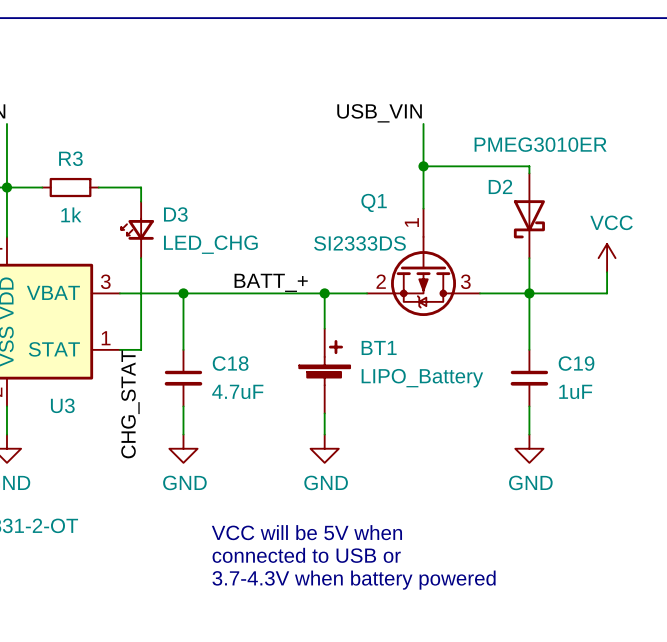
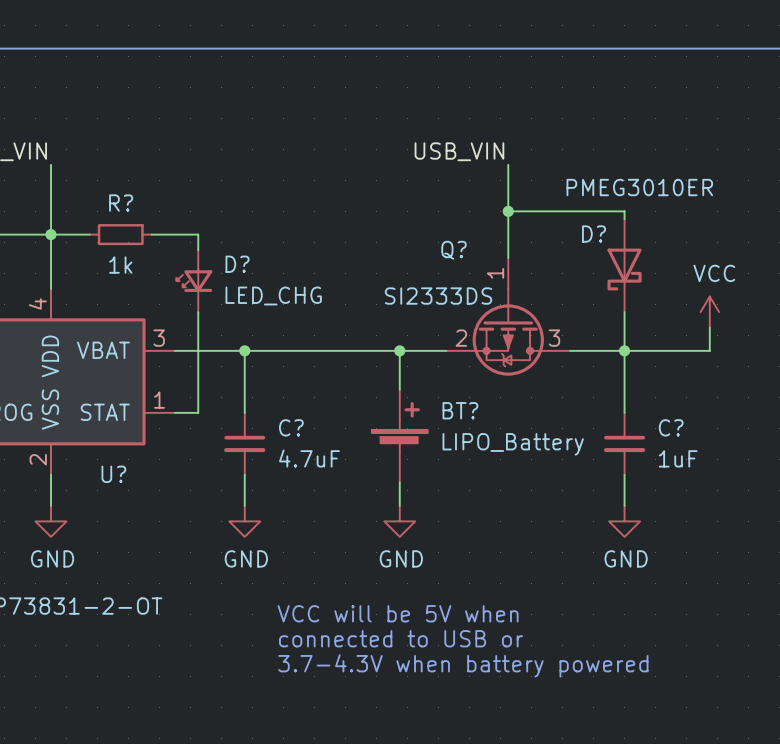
R3 name: R3 (70, 158) -> R? (121, 203)
D2 name: D2 (500, 186) -> D? (594, 234)
Q1 name: Q1 (374, 202) -> Q? (454, 250)
D3 name: D3 (175, 214) -> D? (237, 264)
label: BATT_+ (271, 282) -> none
BT1 name: BT1 (379, 347) -> BT? (460, 410)
C18 name: C18 (230, 363) -> C? (291, 427)
C19 name: C19 (576, 363) -> C? (671, 427)
label: CHG_STAT (130, 404) -> none
U3 name: U3 (62, 405) -> U? (113, 474)

